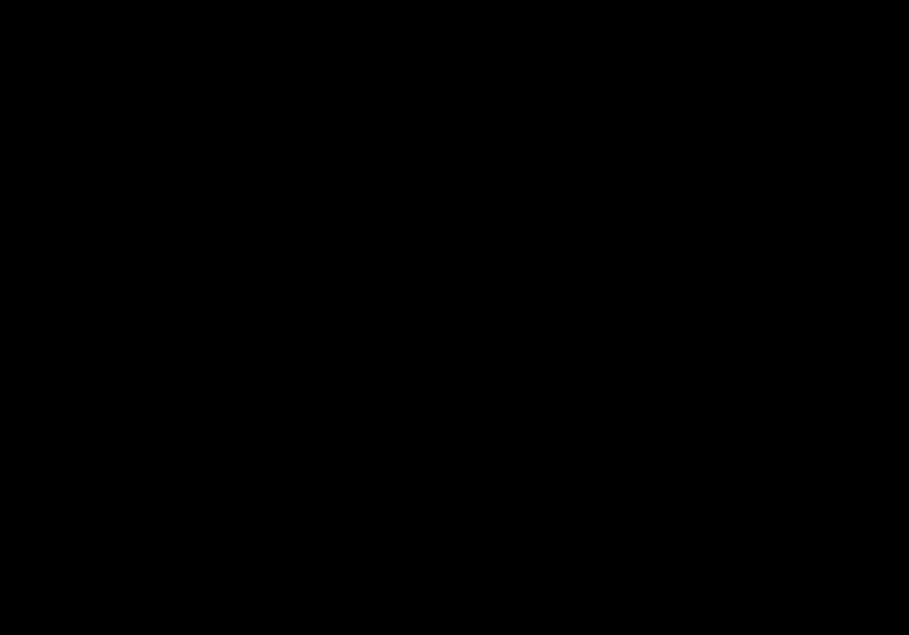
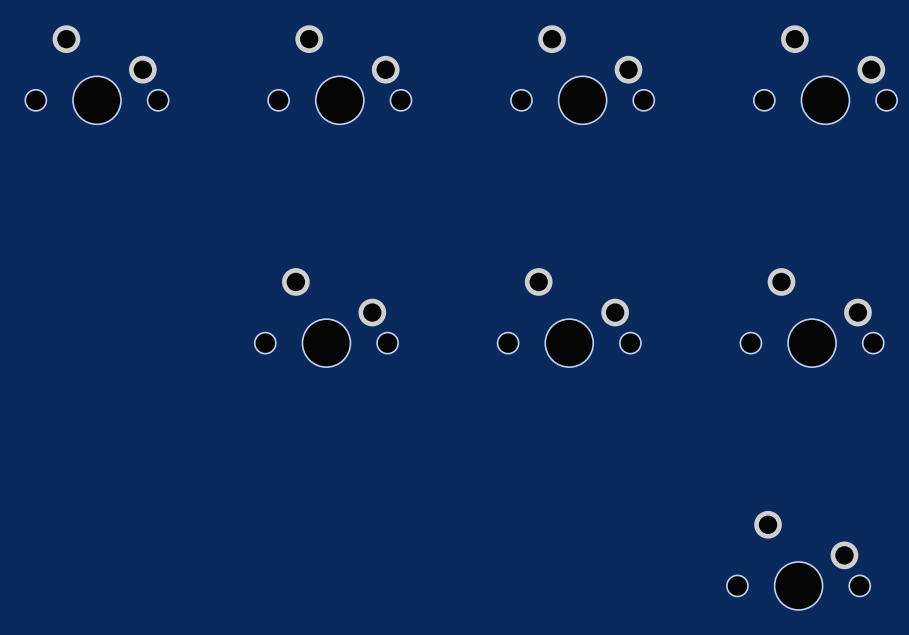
part: none -> (96, 74)
part: none -> (339, 74)
part: none -> (582, 74)
part: none -> (825, 74)
part: none -> (326, 317)
part: none -> (569, 317)
part: none -> (812, 317)
part: none -> (798, 560)

